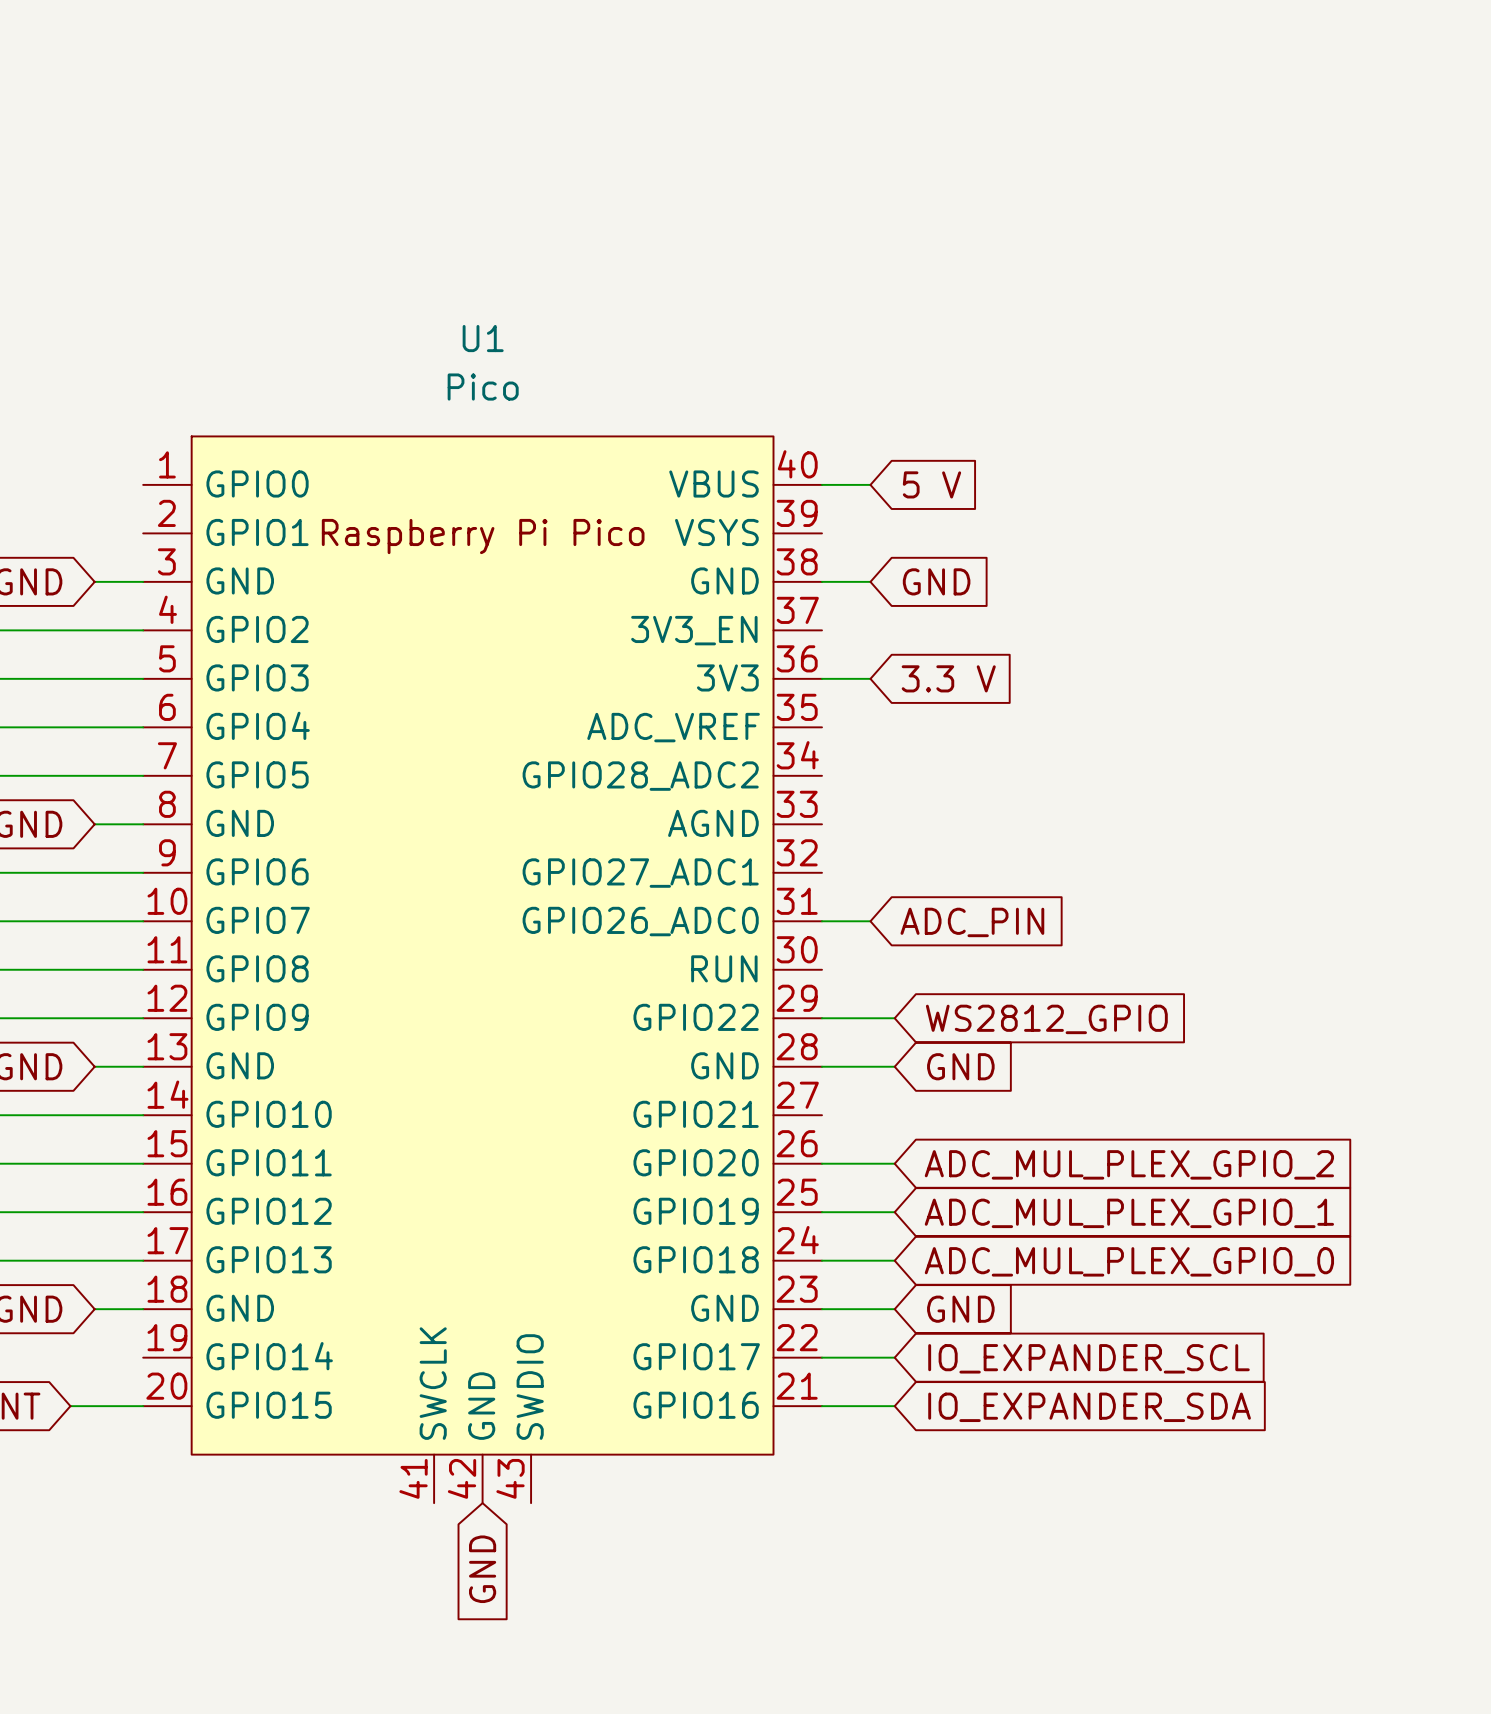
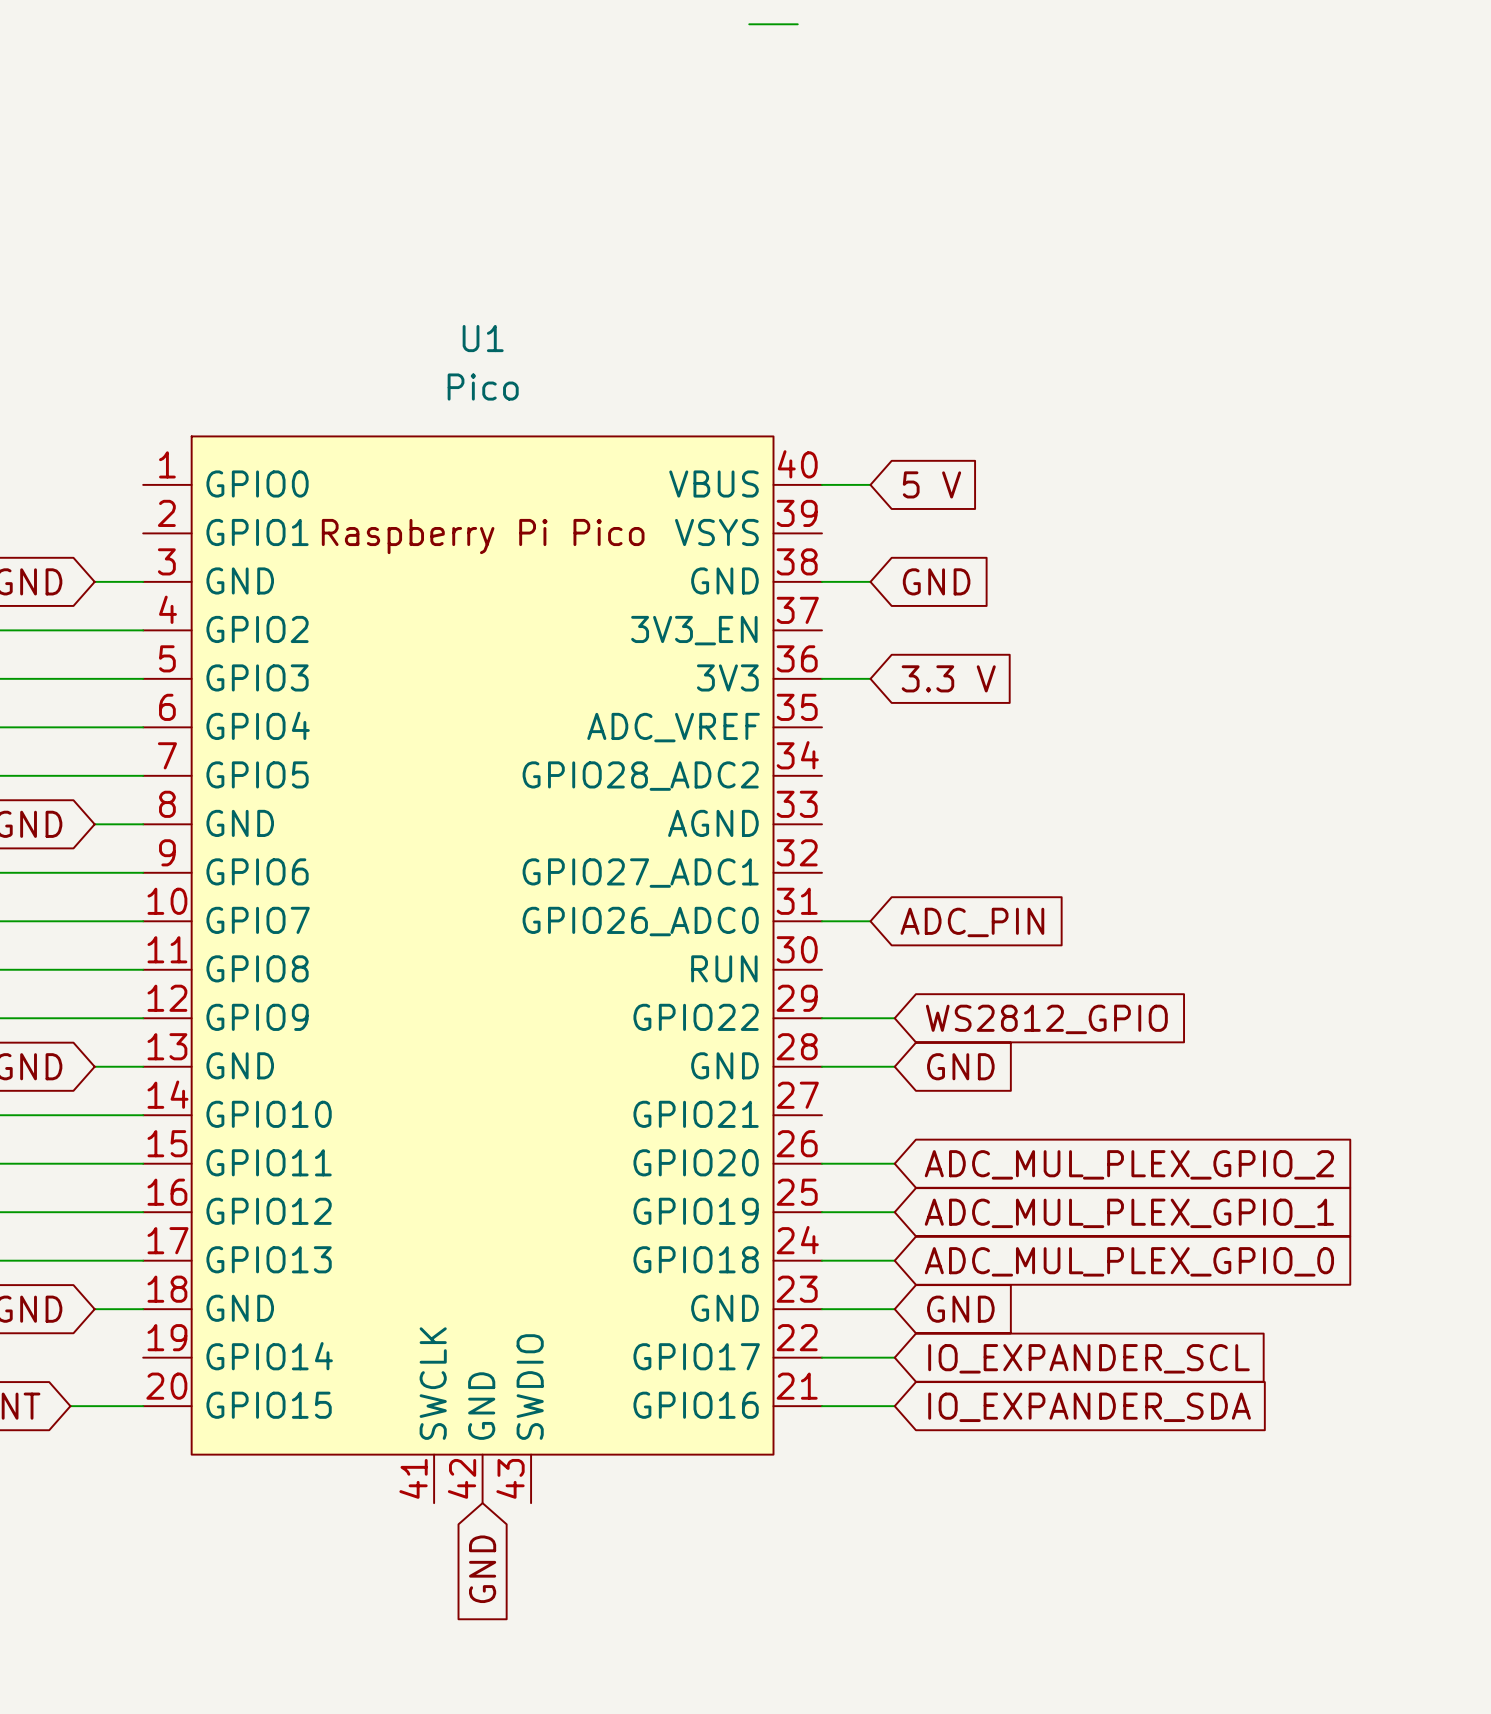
wire: none -> (749, 24) (797, 24)

